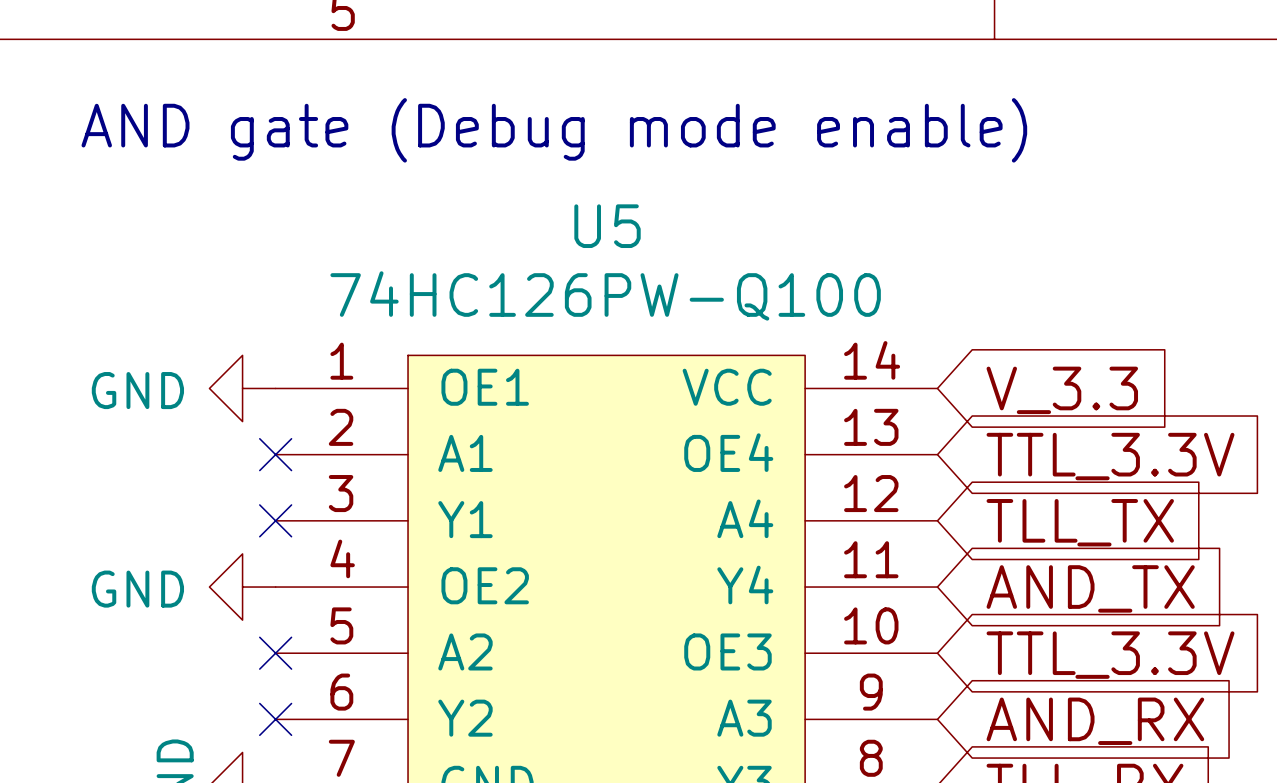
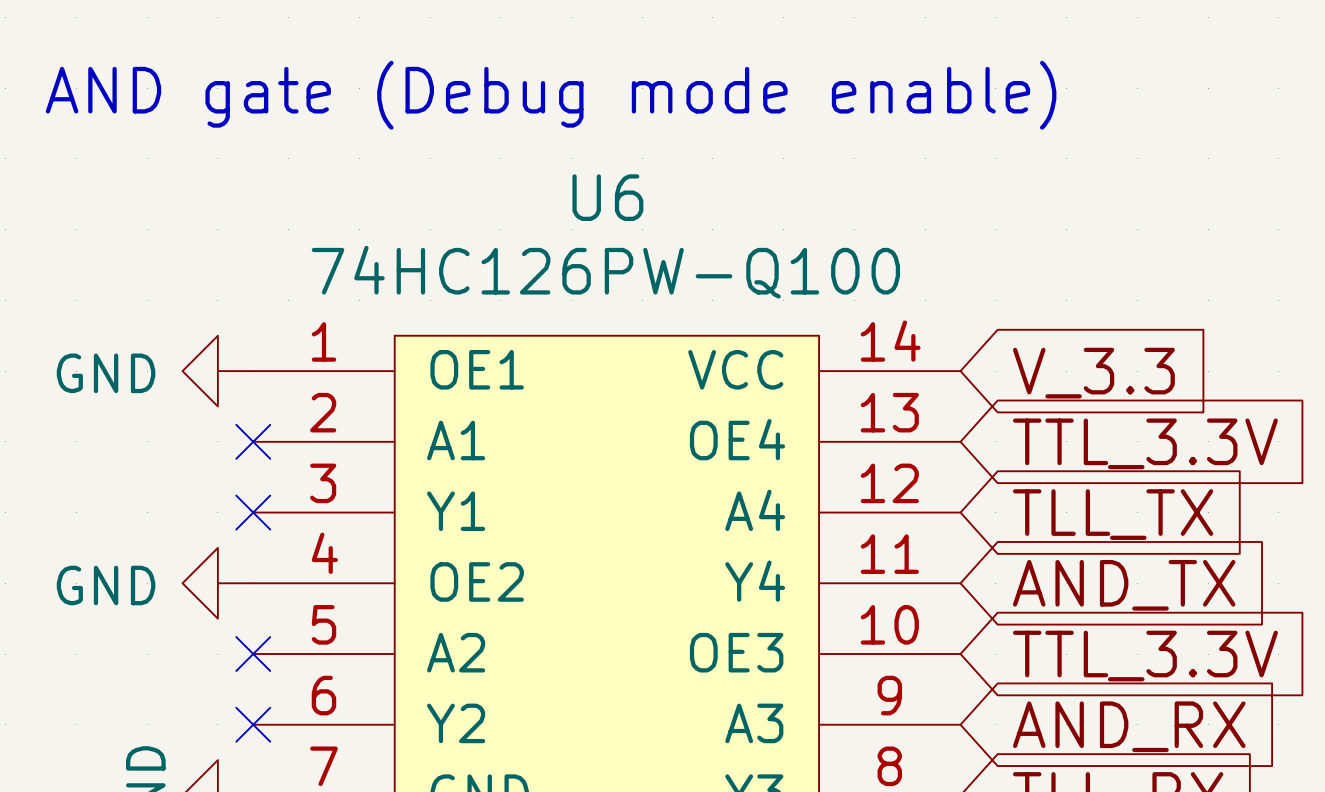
U5 name: U5 (607, 226) -> U6 (607, 197)

